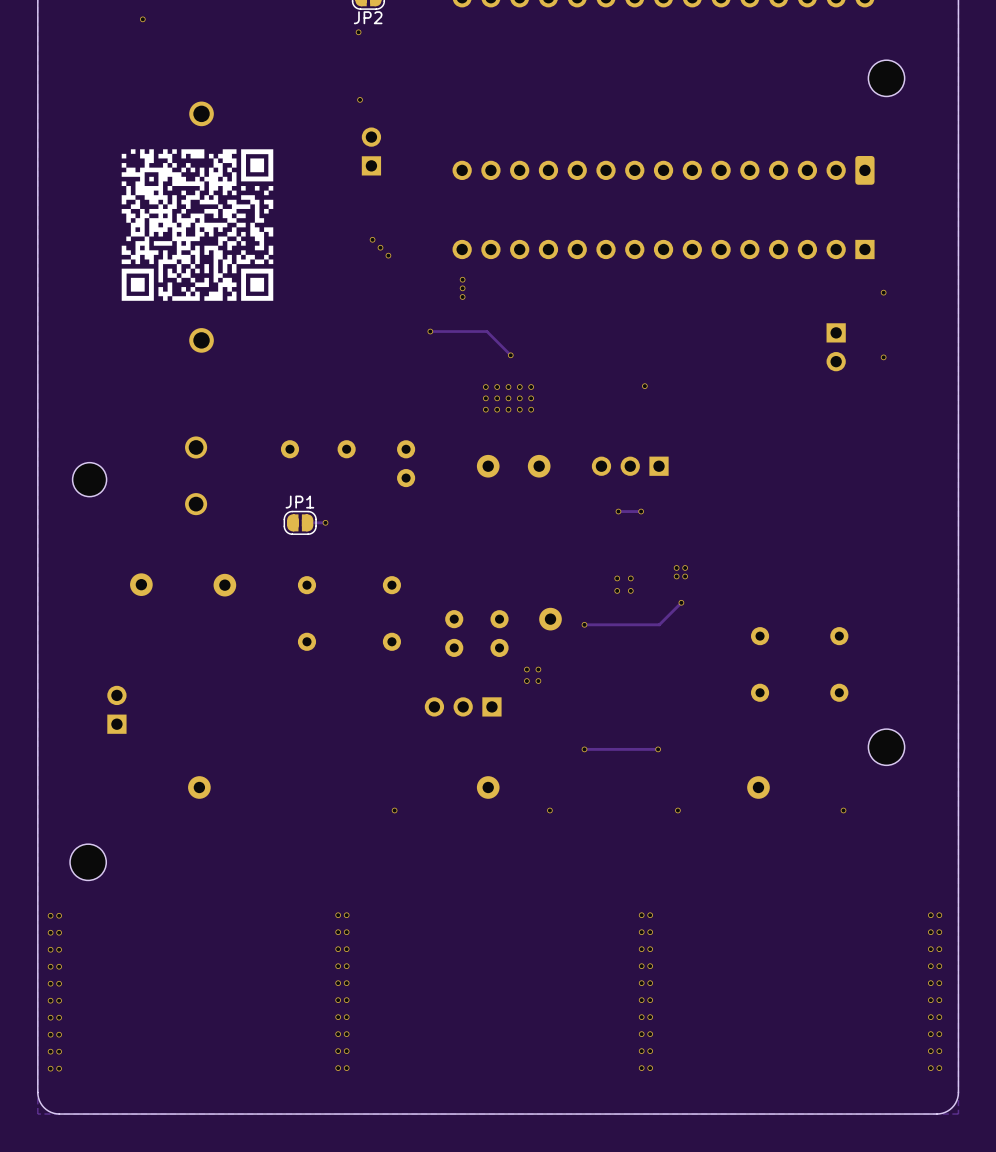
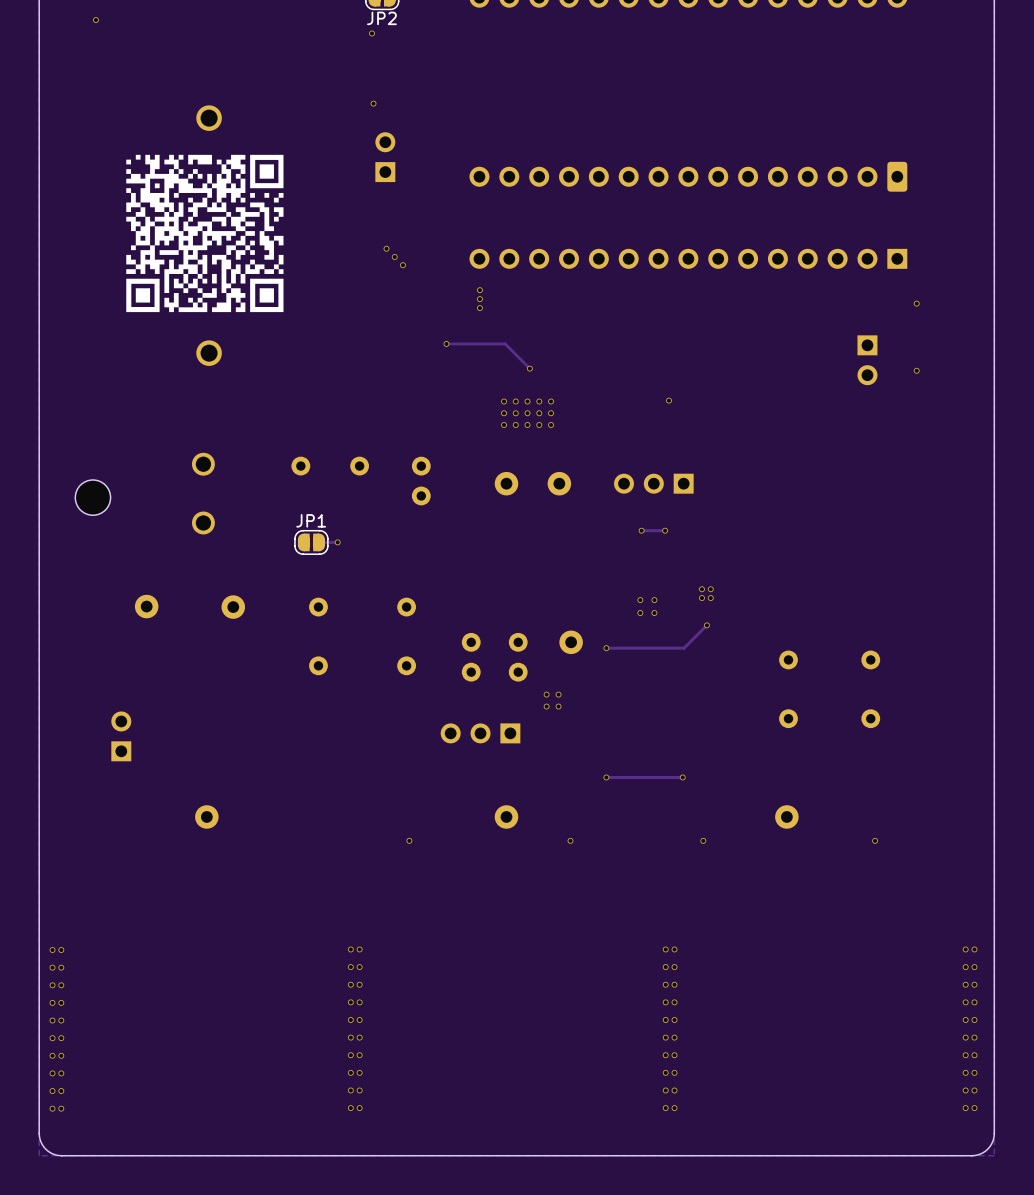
via position: (142, 19) -> (95, 20)
part: (886, 78) -> none
part: (886, 747) -> none
part: (88, 862) -> none

